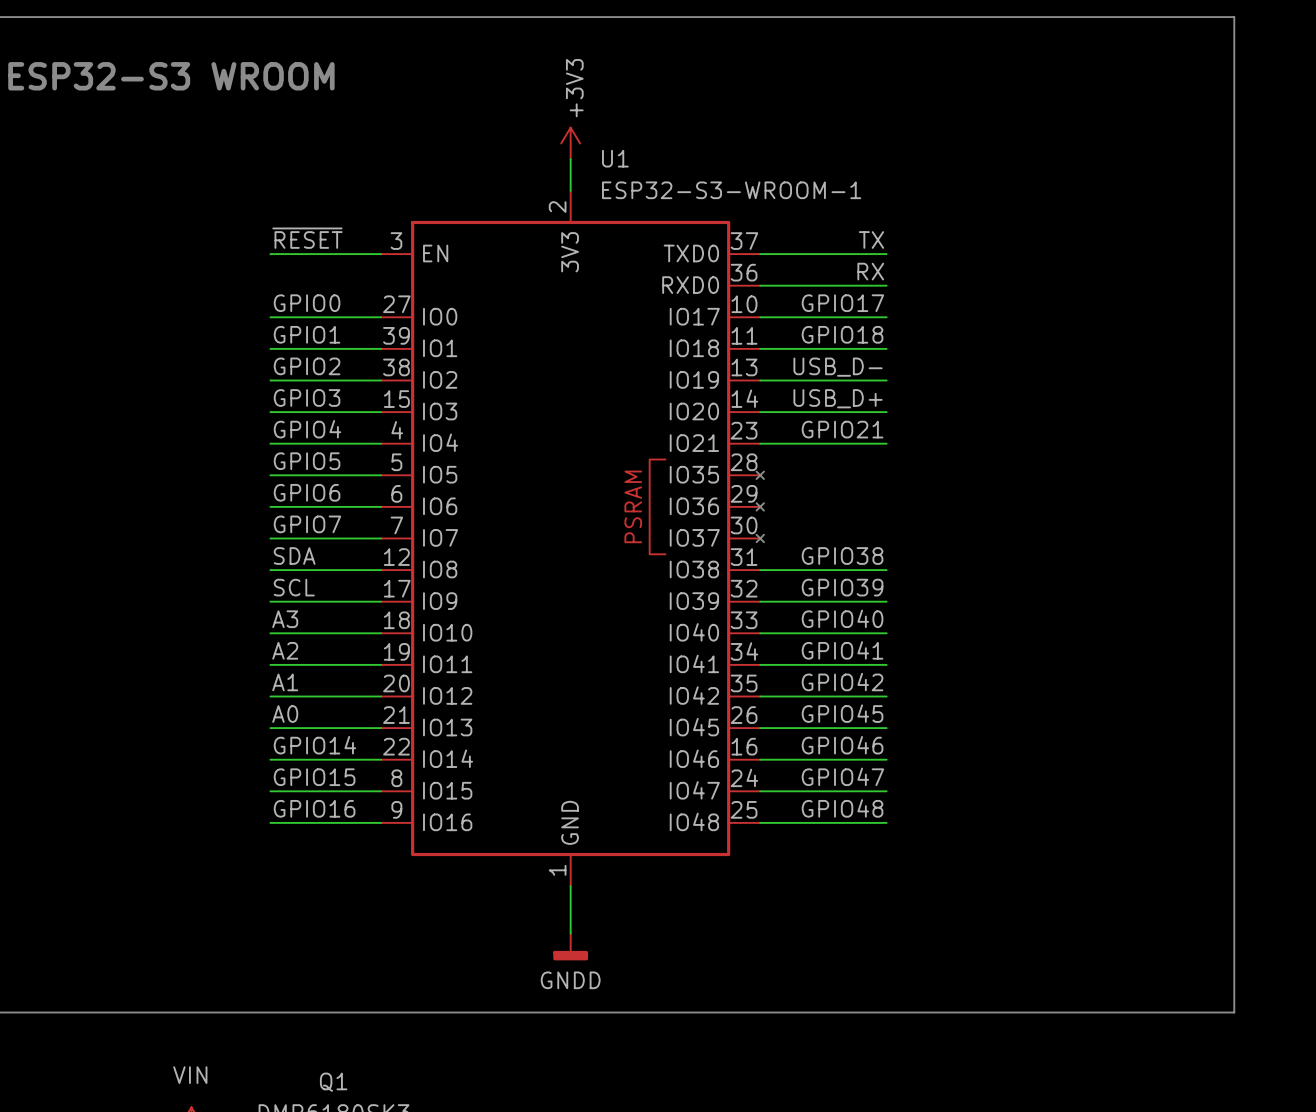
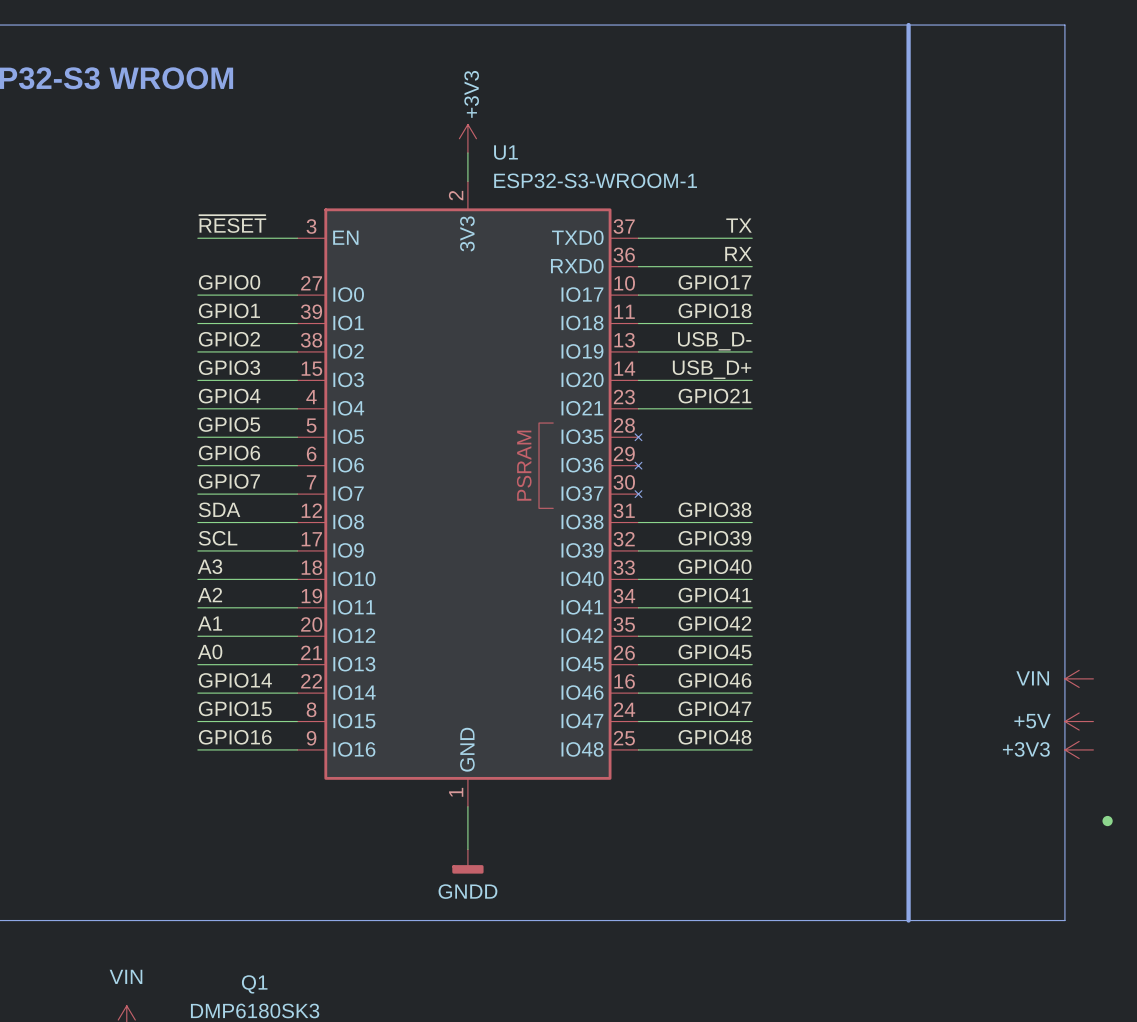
line: none -> (908, 25) (908, 920)
power symbol: none -> VIN (1079, 678)
power symbol: none -> +5V (1079, 721)
power symbol: none -> +3V3 (1079, 749)
junction: none -> (1107, 821)

